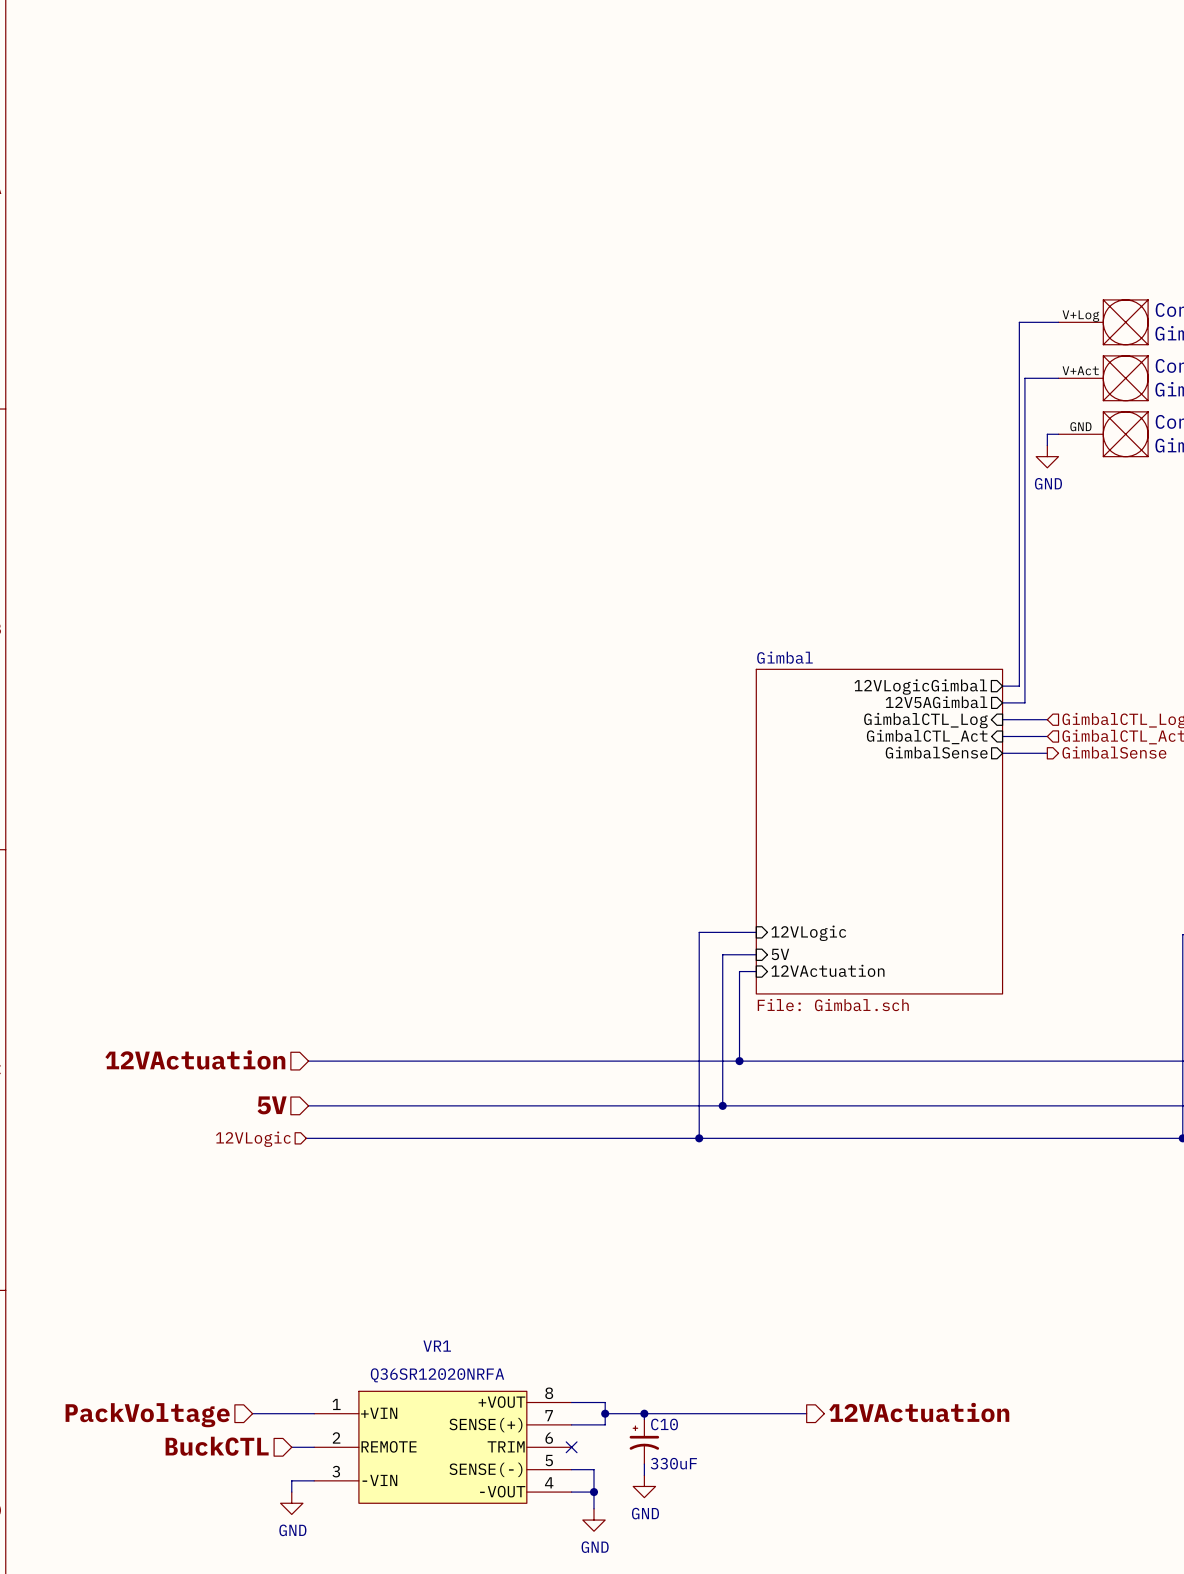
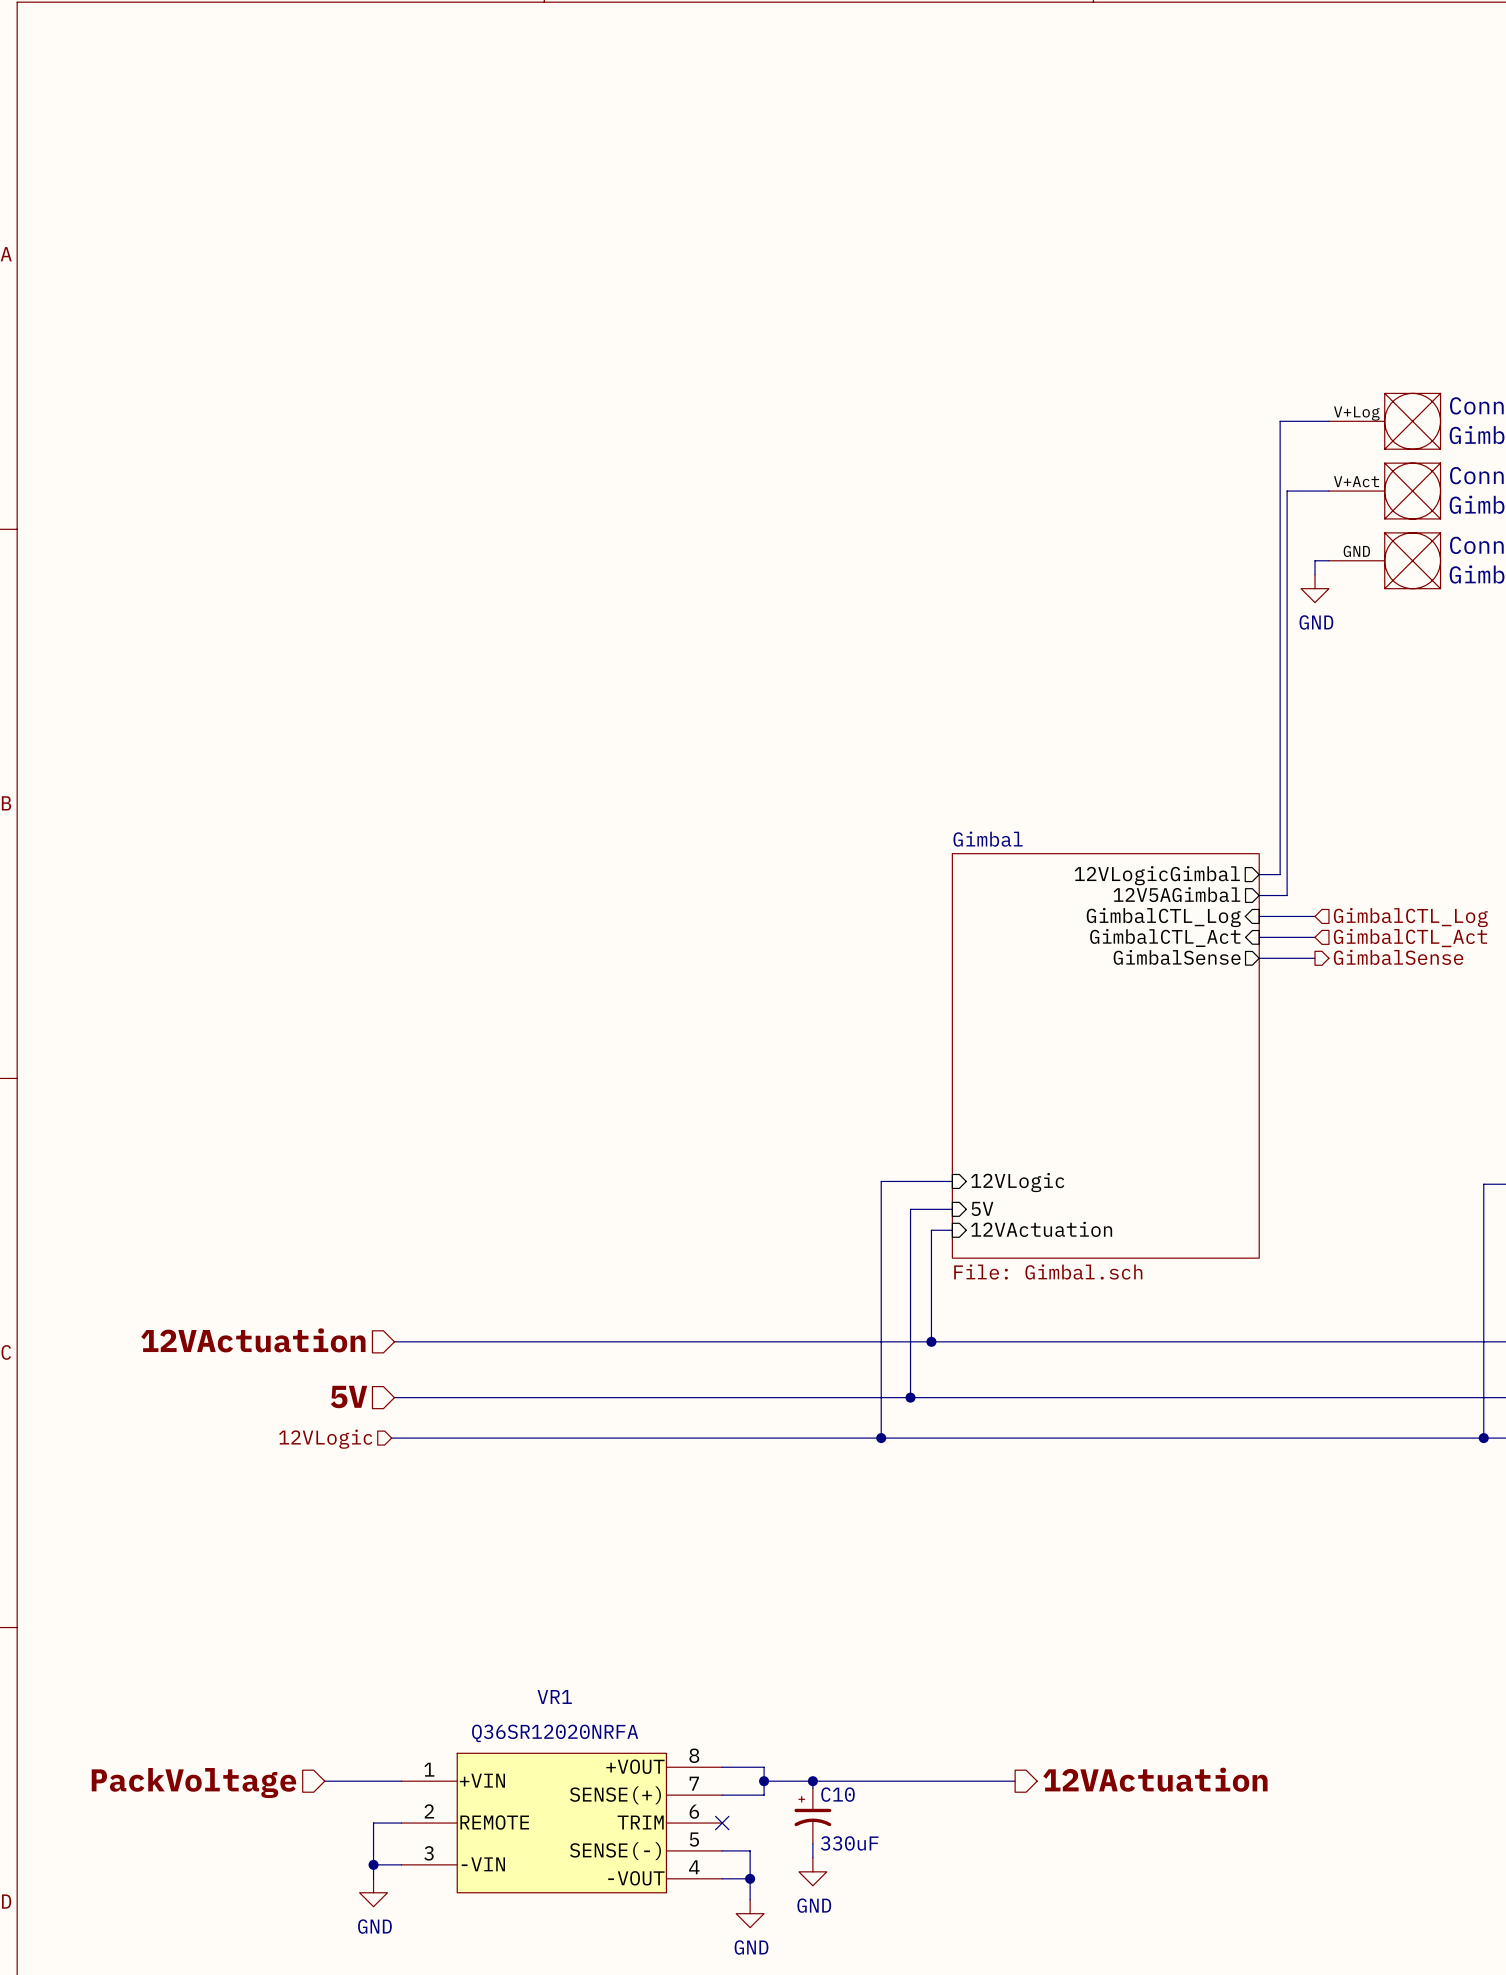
hierarchical label: BuckCTL (217, 1446) -> none
wire: none -> (373, 1823) (373, 1864)
junction: none -> (373, 1864)

